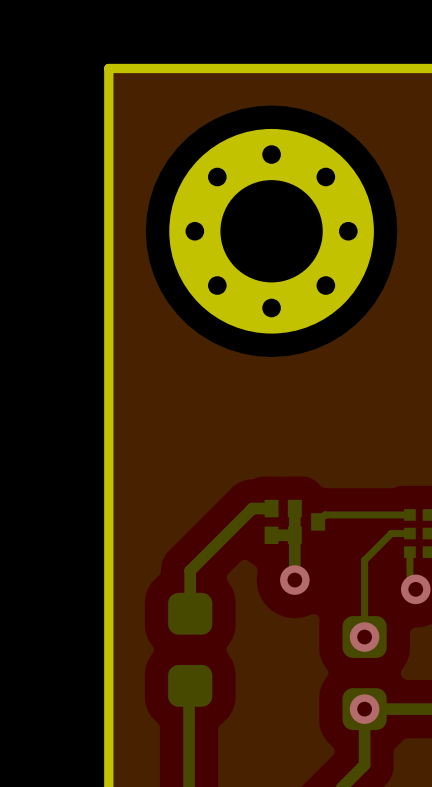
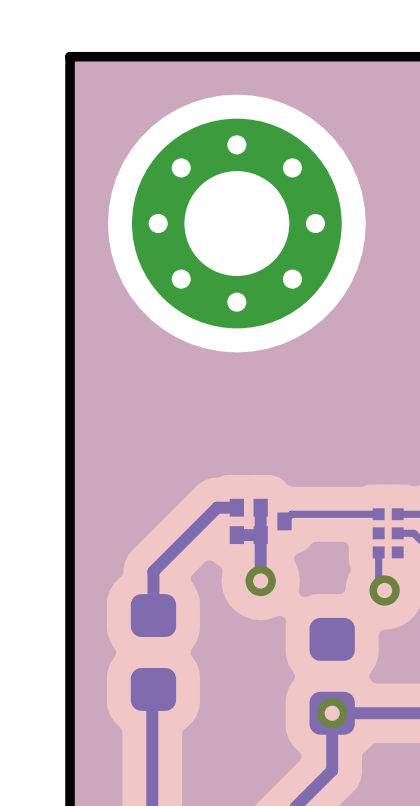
bottom track: (409, 533) (391, 533) (364, 560) (364, 637) -> none
via: (364, 637) -> none

